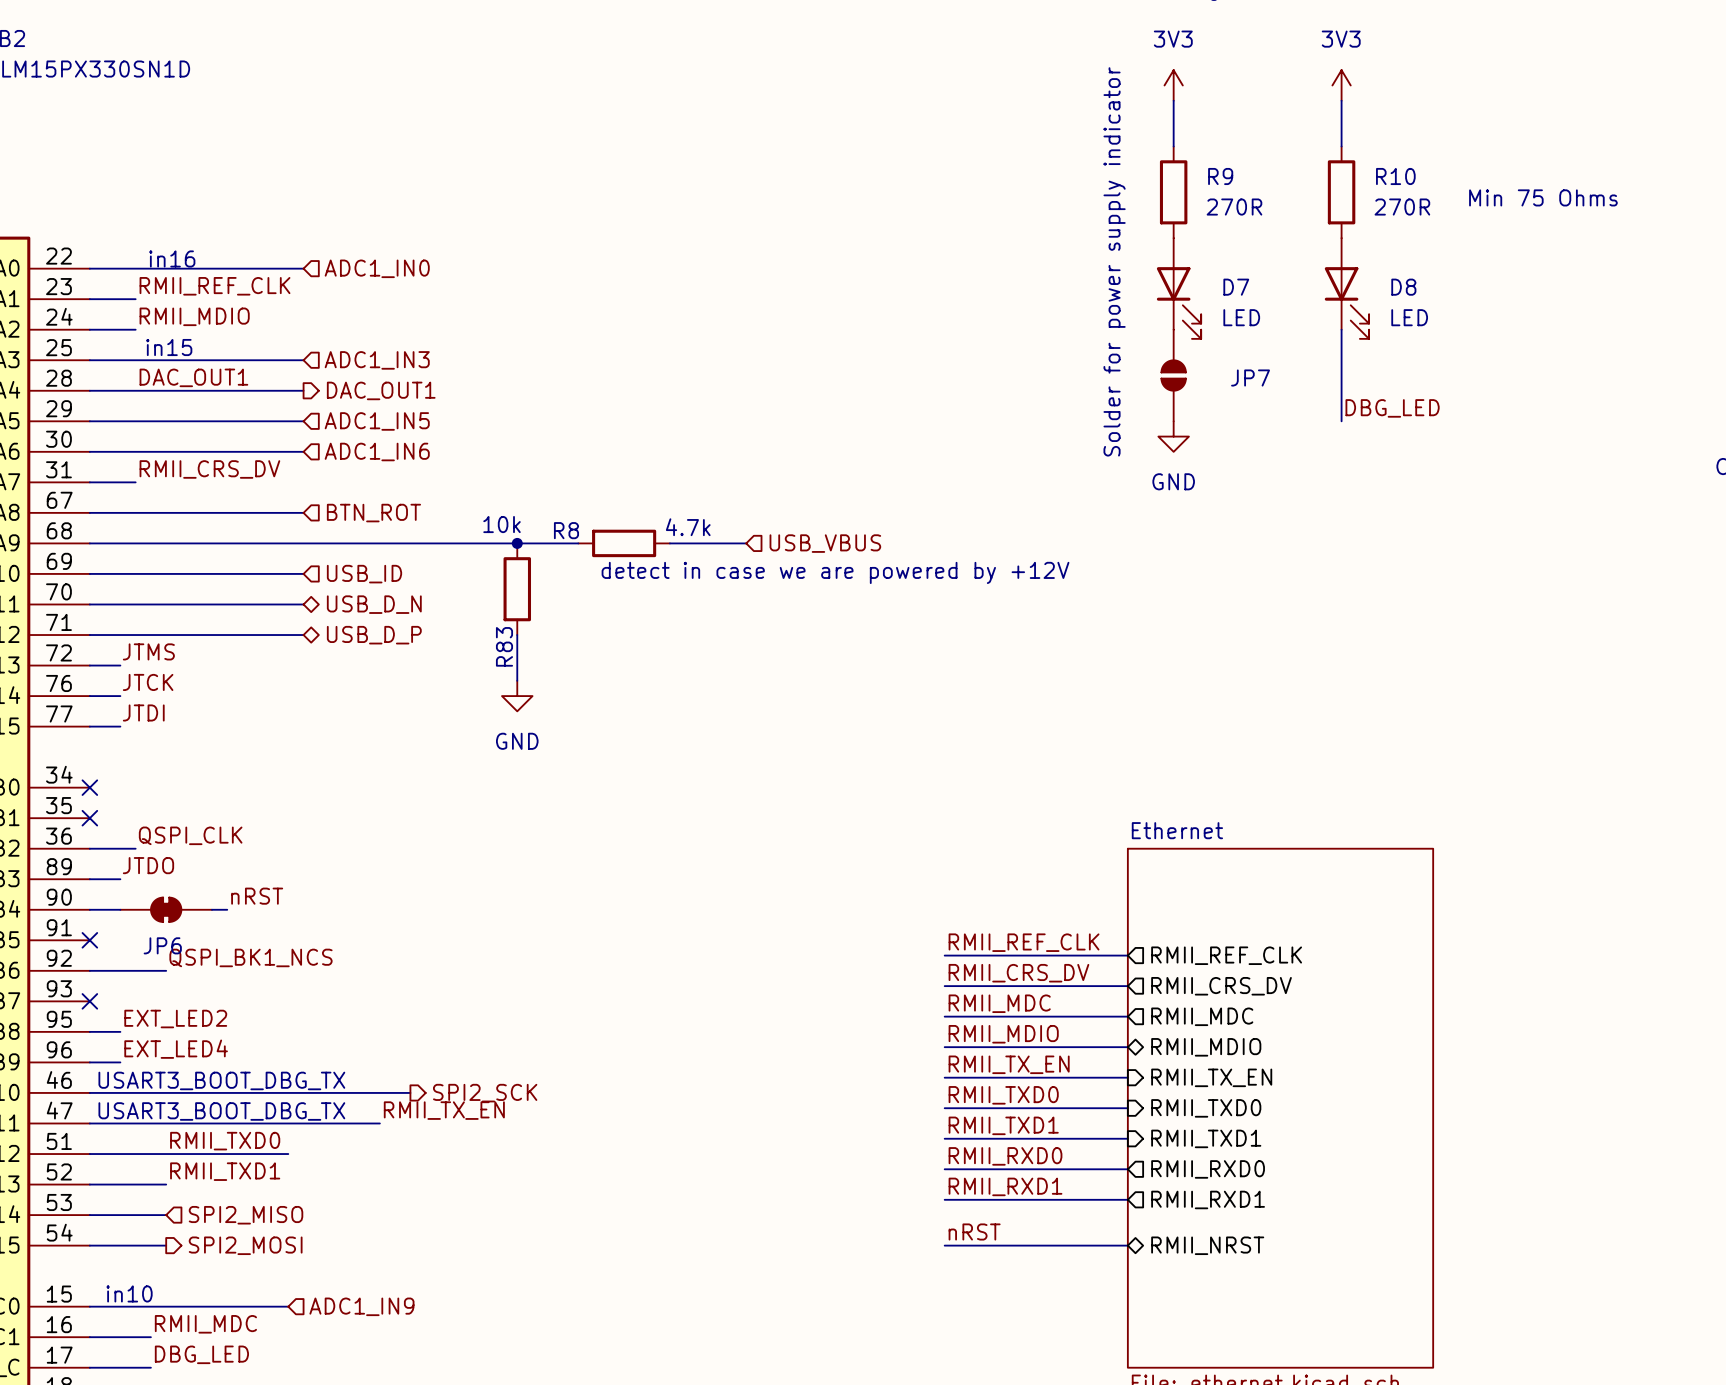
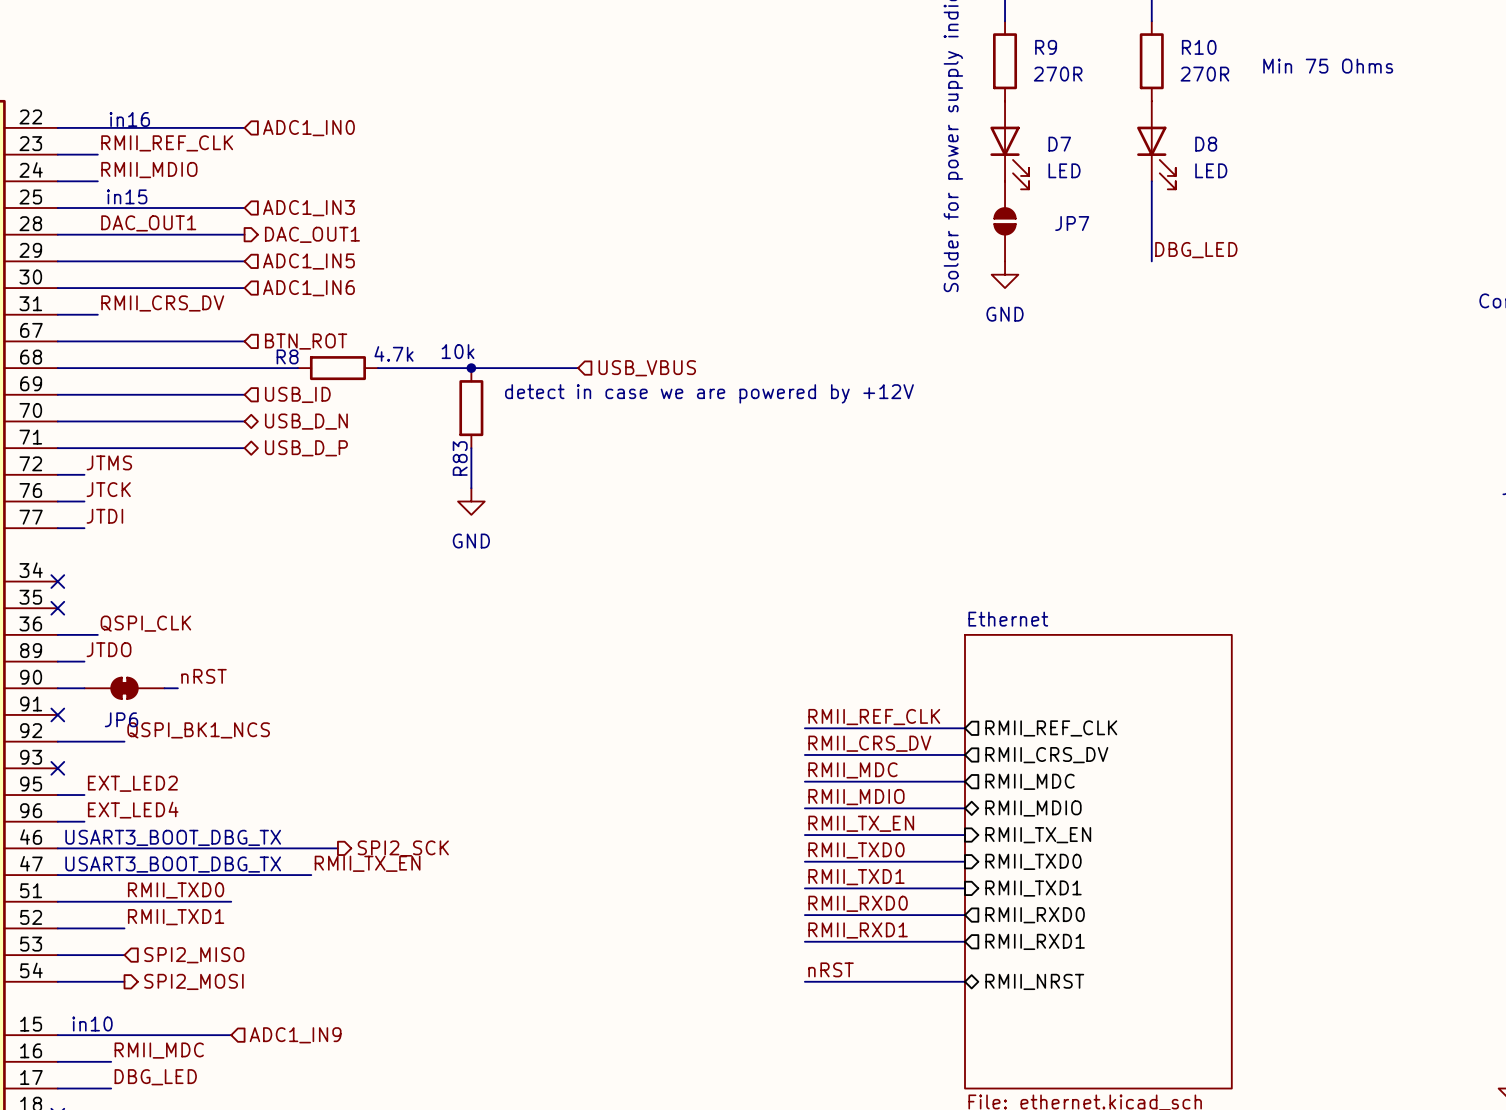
wire: (364, 543) (456, 543) -> (484, 368) (564, 368)
junction position: (517, 543) -> (471, 368)
R8 position: (624, 543) -> (337, 368)
wire: (685, 543) (746, 543) -> none
hierarchical label position: USB_VBUS (825, 543) -> USB_VBUS (647, 368)
R83 position: (517, 589) -> (471, 408)
wire: (517, 635) (517, 680) -> (471, 448) (471, 488)
power symbol position: GND (517, 696) -> GND (471, 501)

